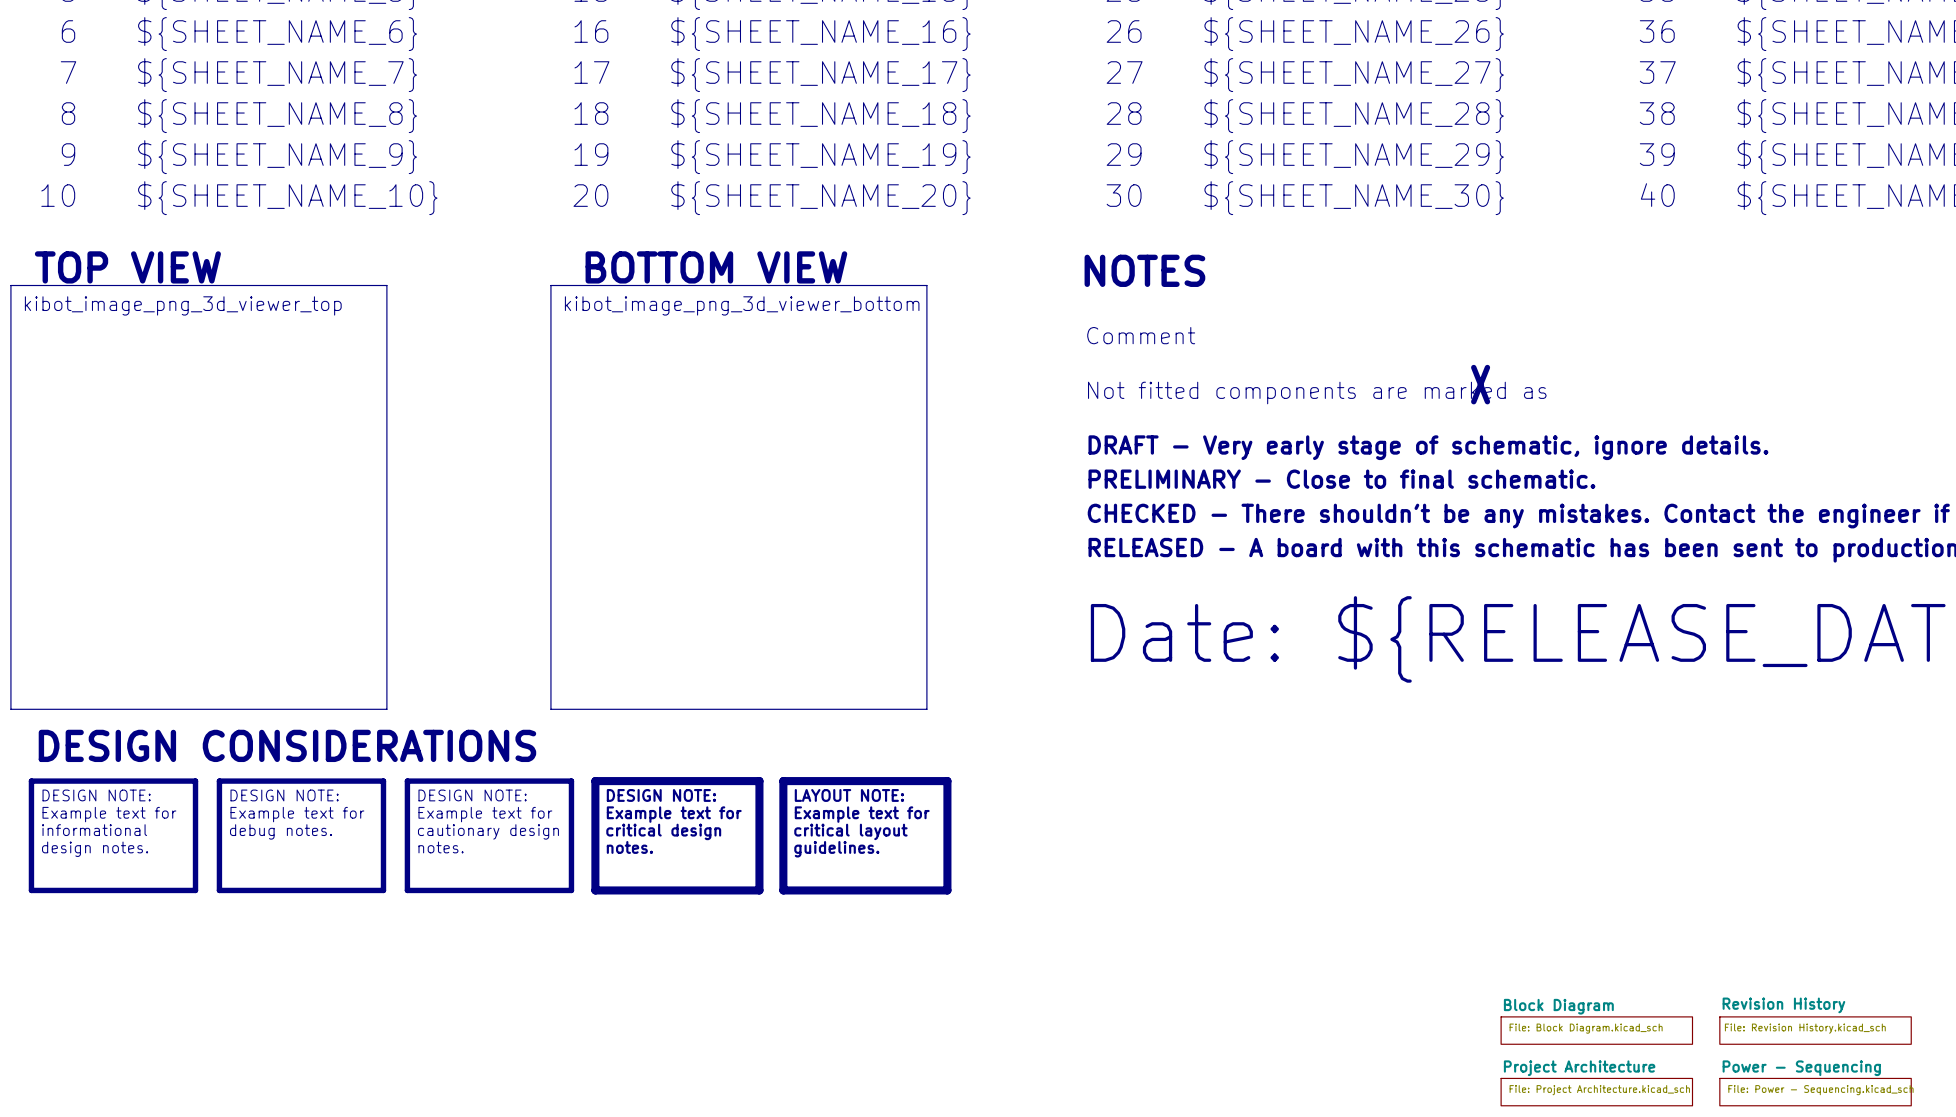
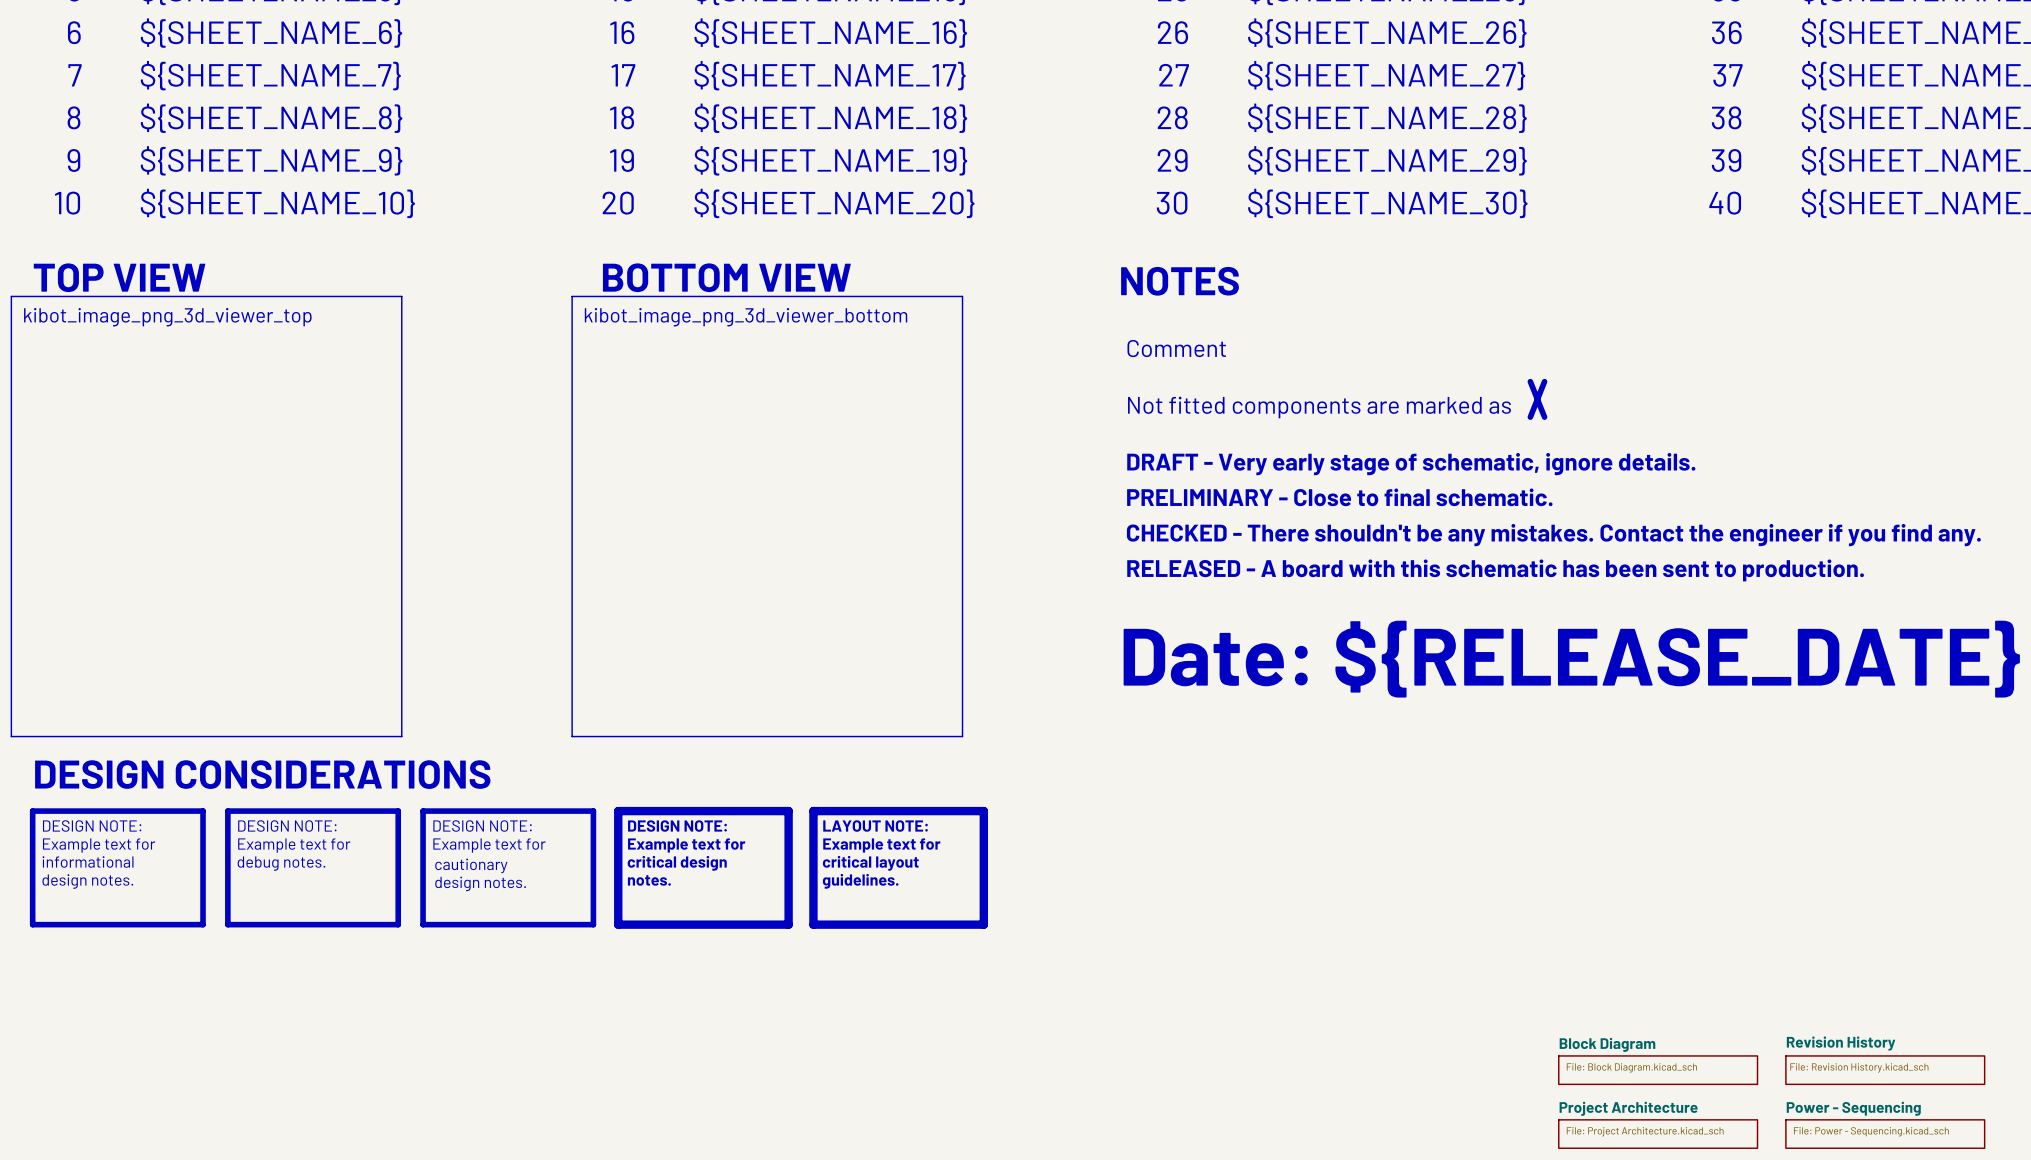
text: cautionary design (488, 831) -> cautionary (471, 865)
text: notes. (441, 847) -> design notes. (480, 883)

